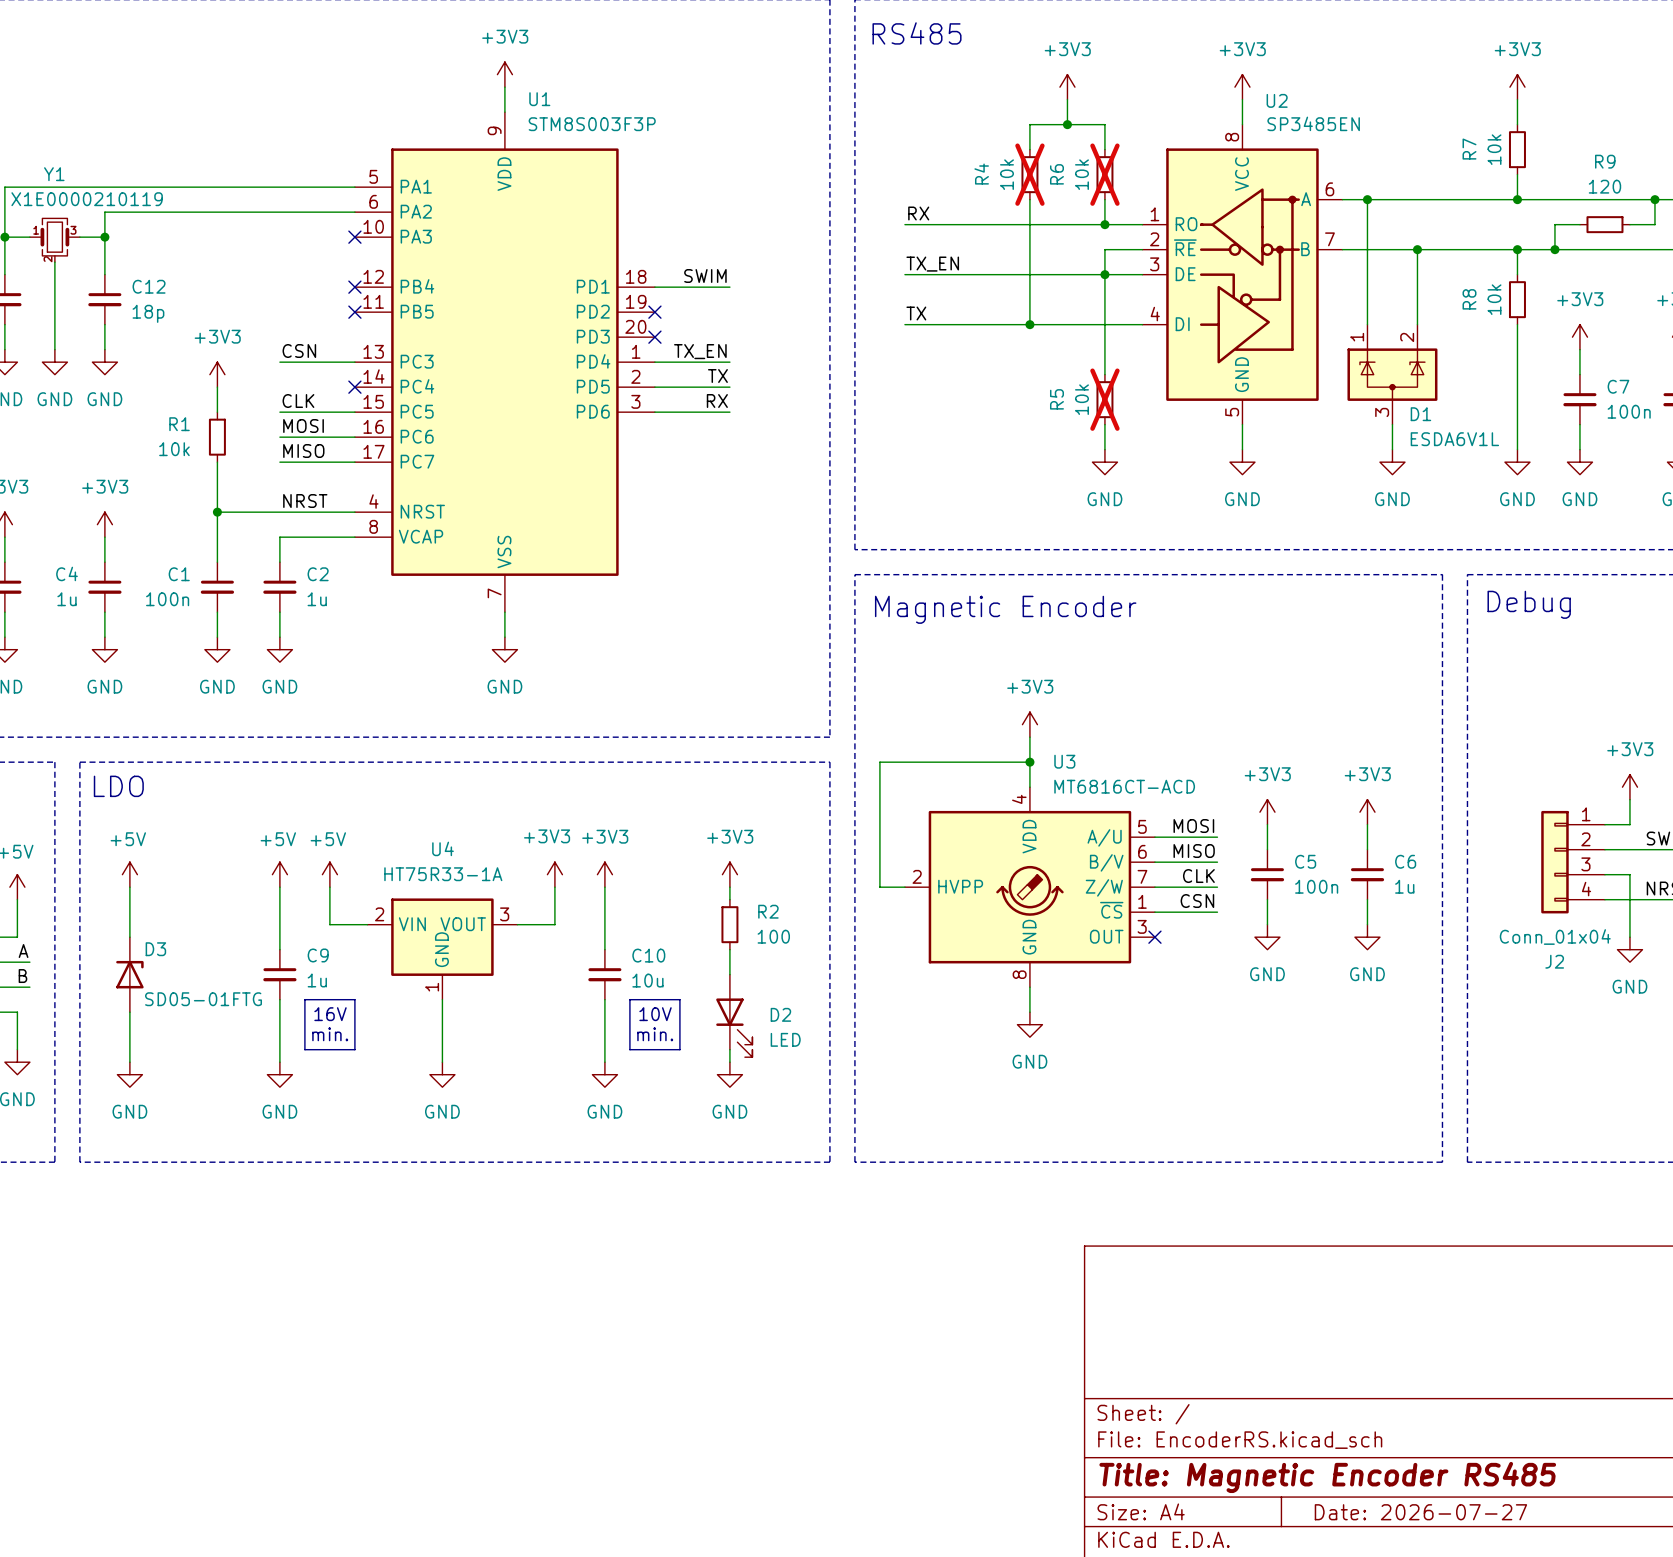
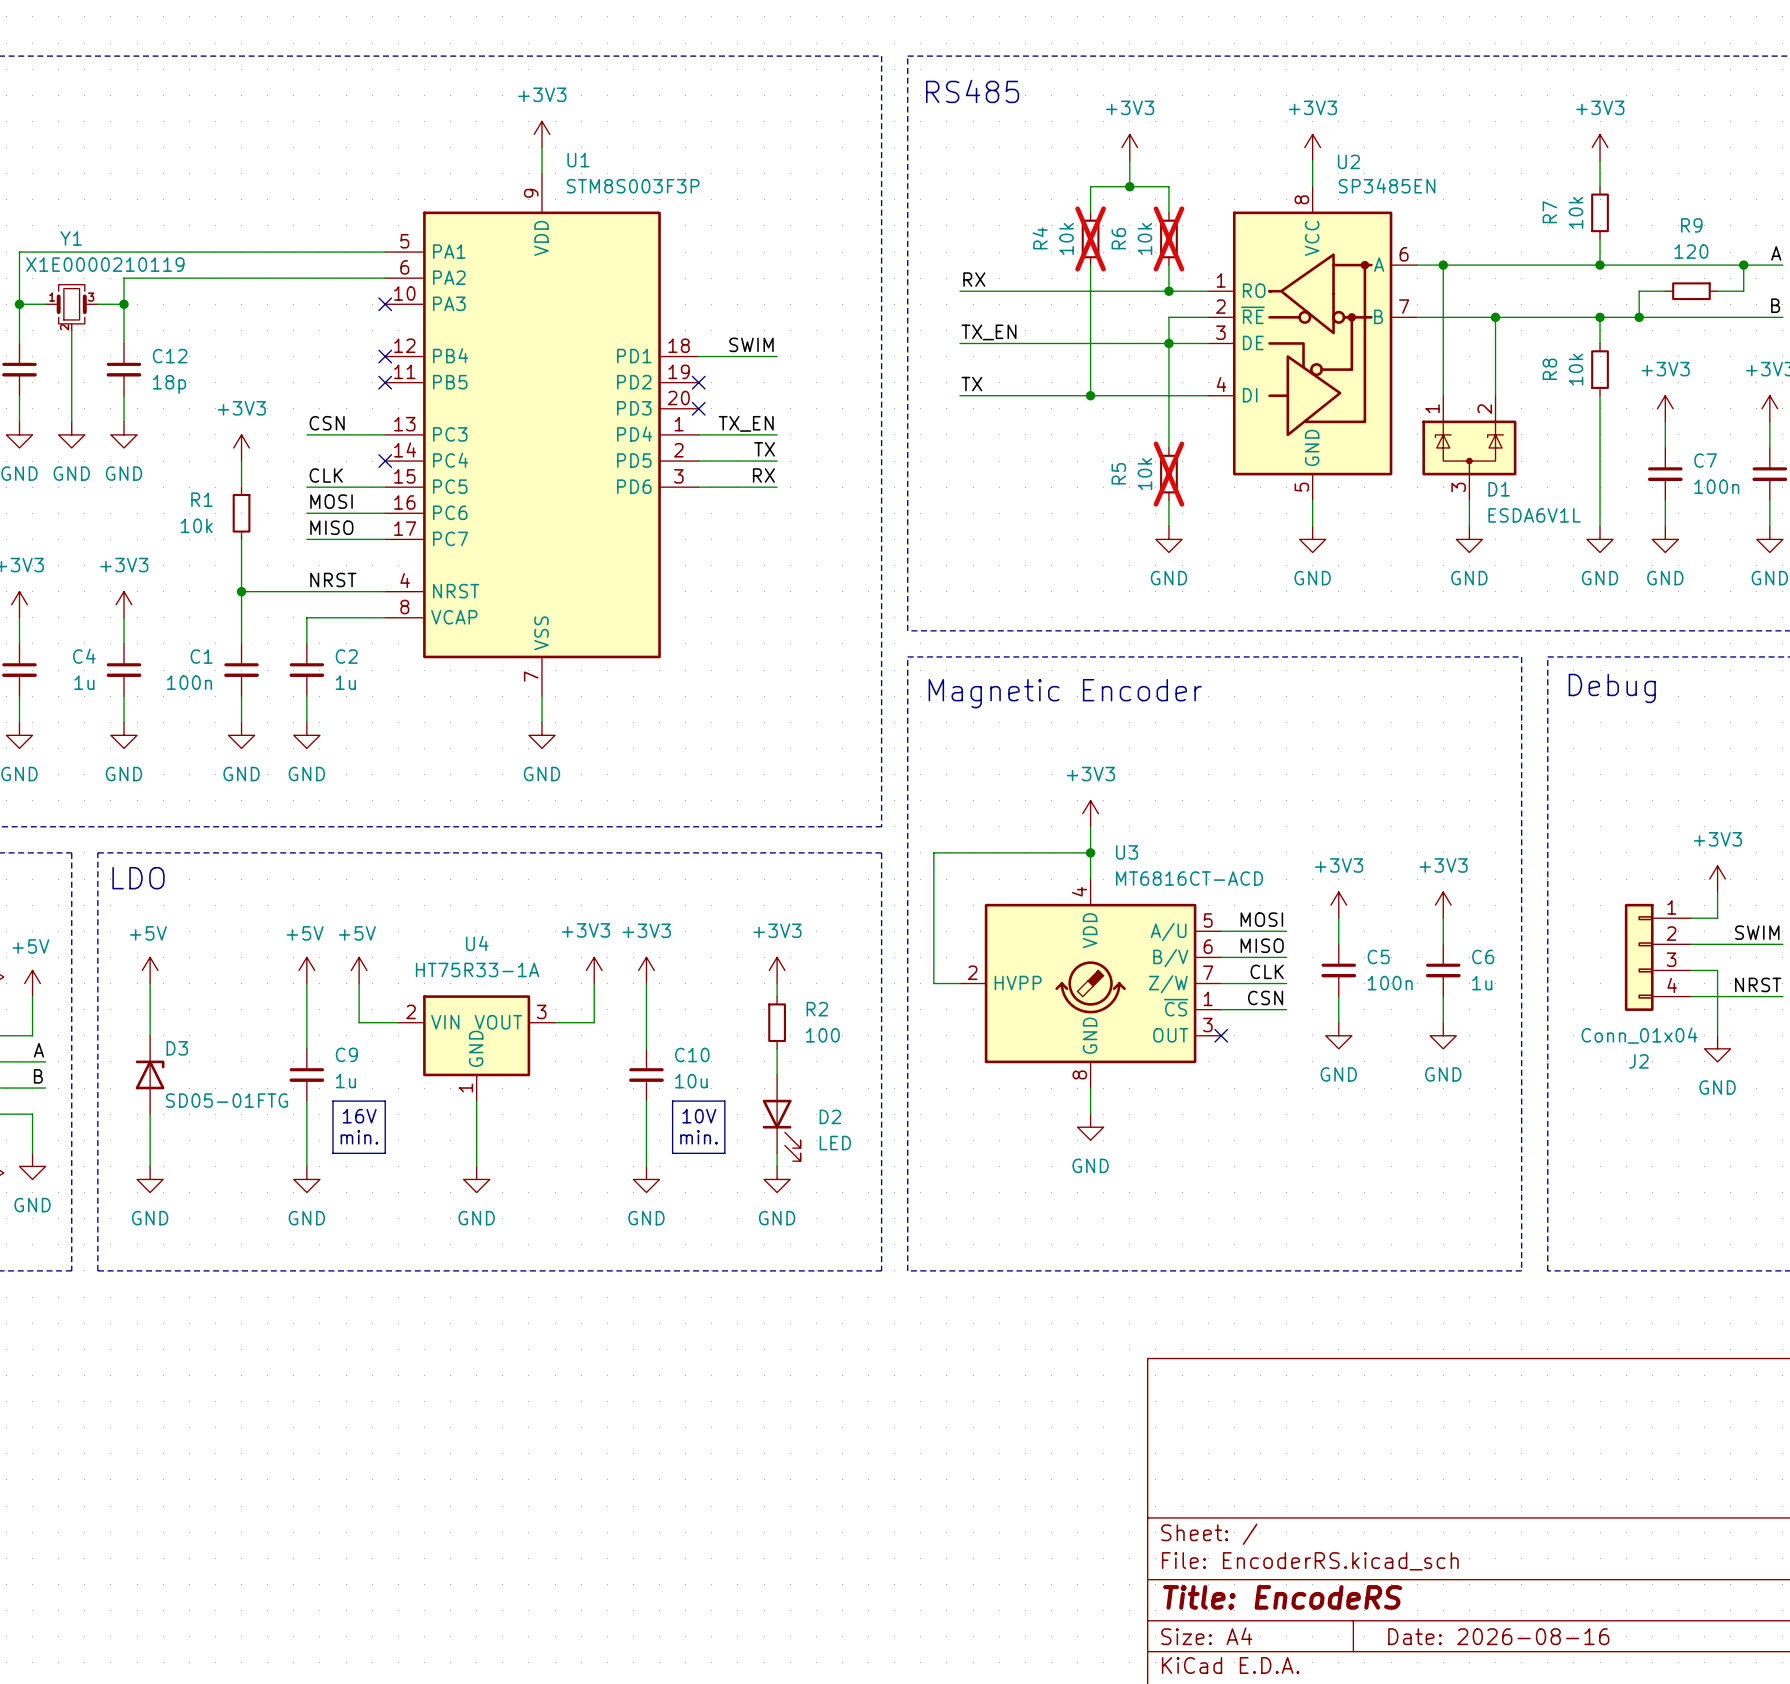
title block: Title: Magnetic Encoder RS485 (1327, 1477) -> Title: EncodeRS (1282, 1597)
title block: Date: 2026-07-27 (1420, 1512) -> Date: 2026-08-16 (1498, 1636)

